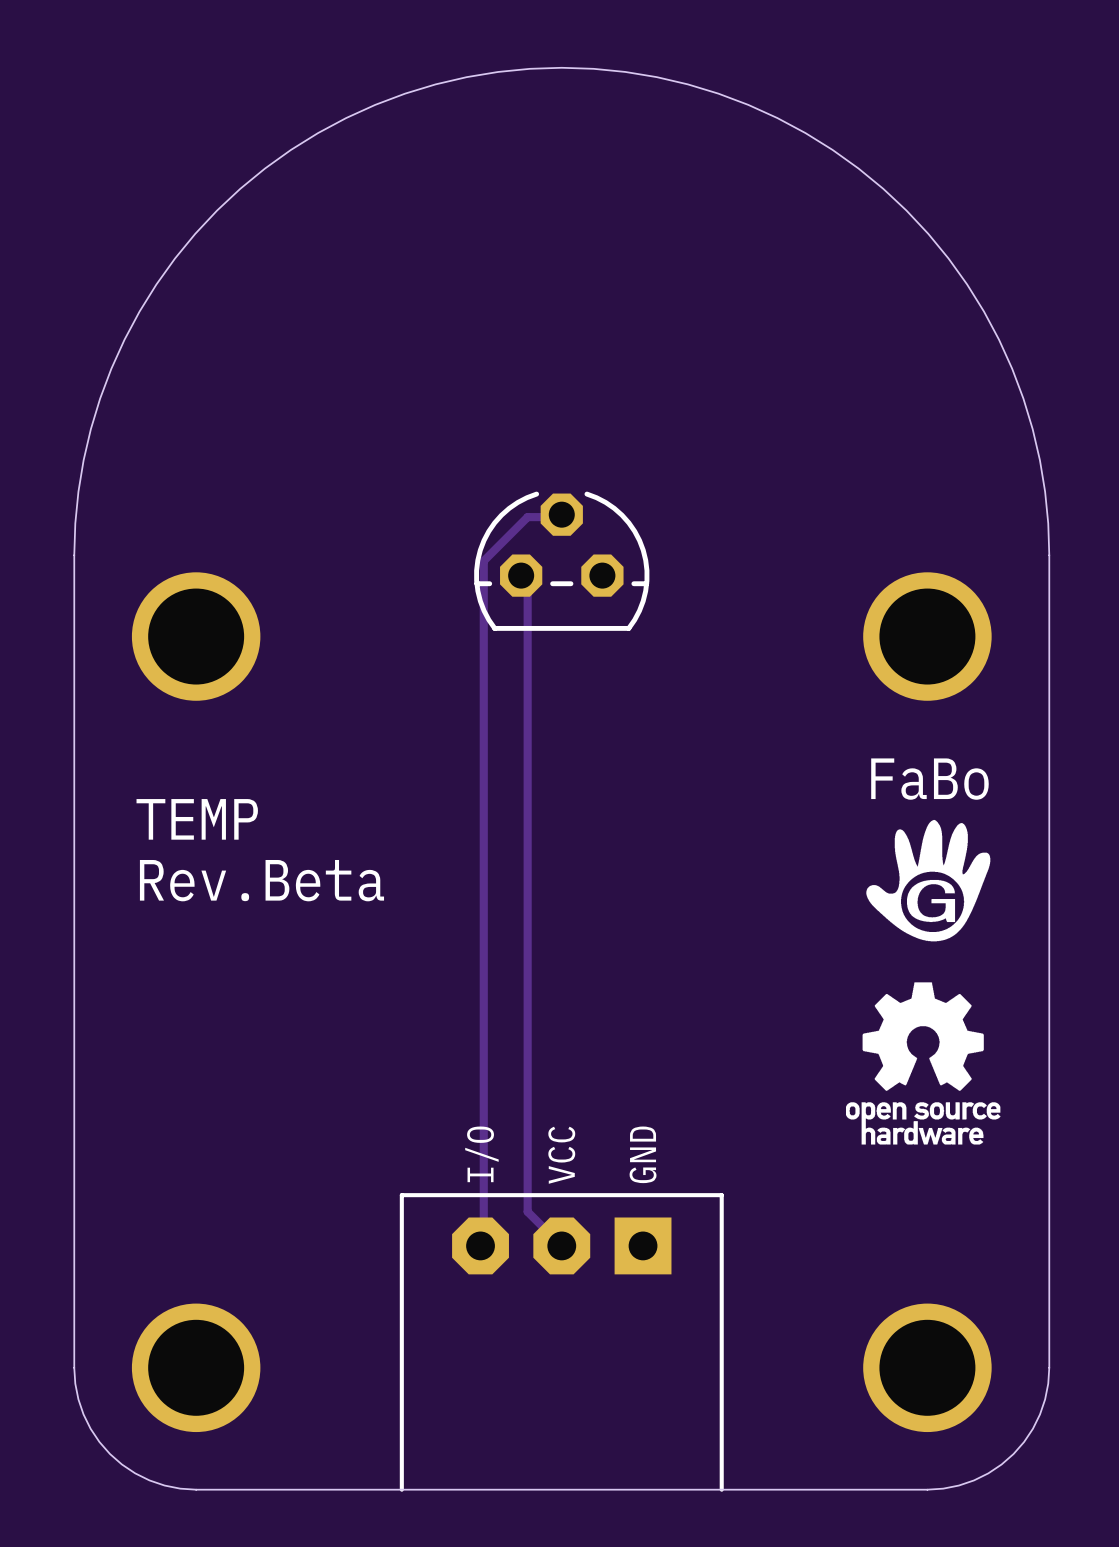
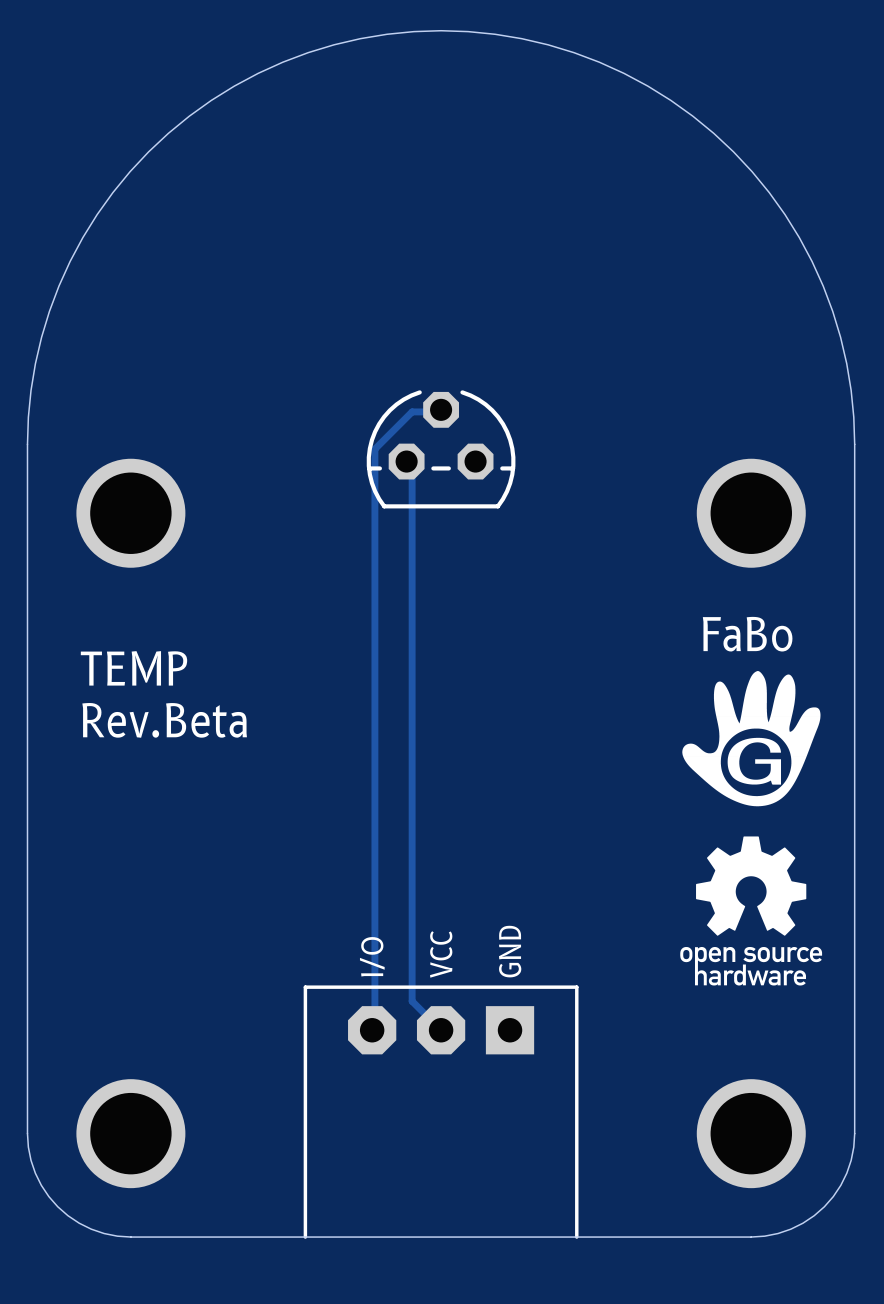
drawing shape: [866, 819, 991, 942] -> [682, 671, 821, 807]
drawing: [846, 982, 1001, 1145] -> none
drawing: none -> [680, 836, 823, 986]

